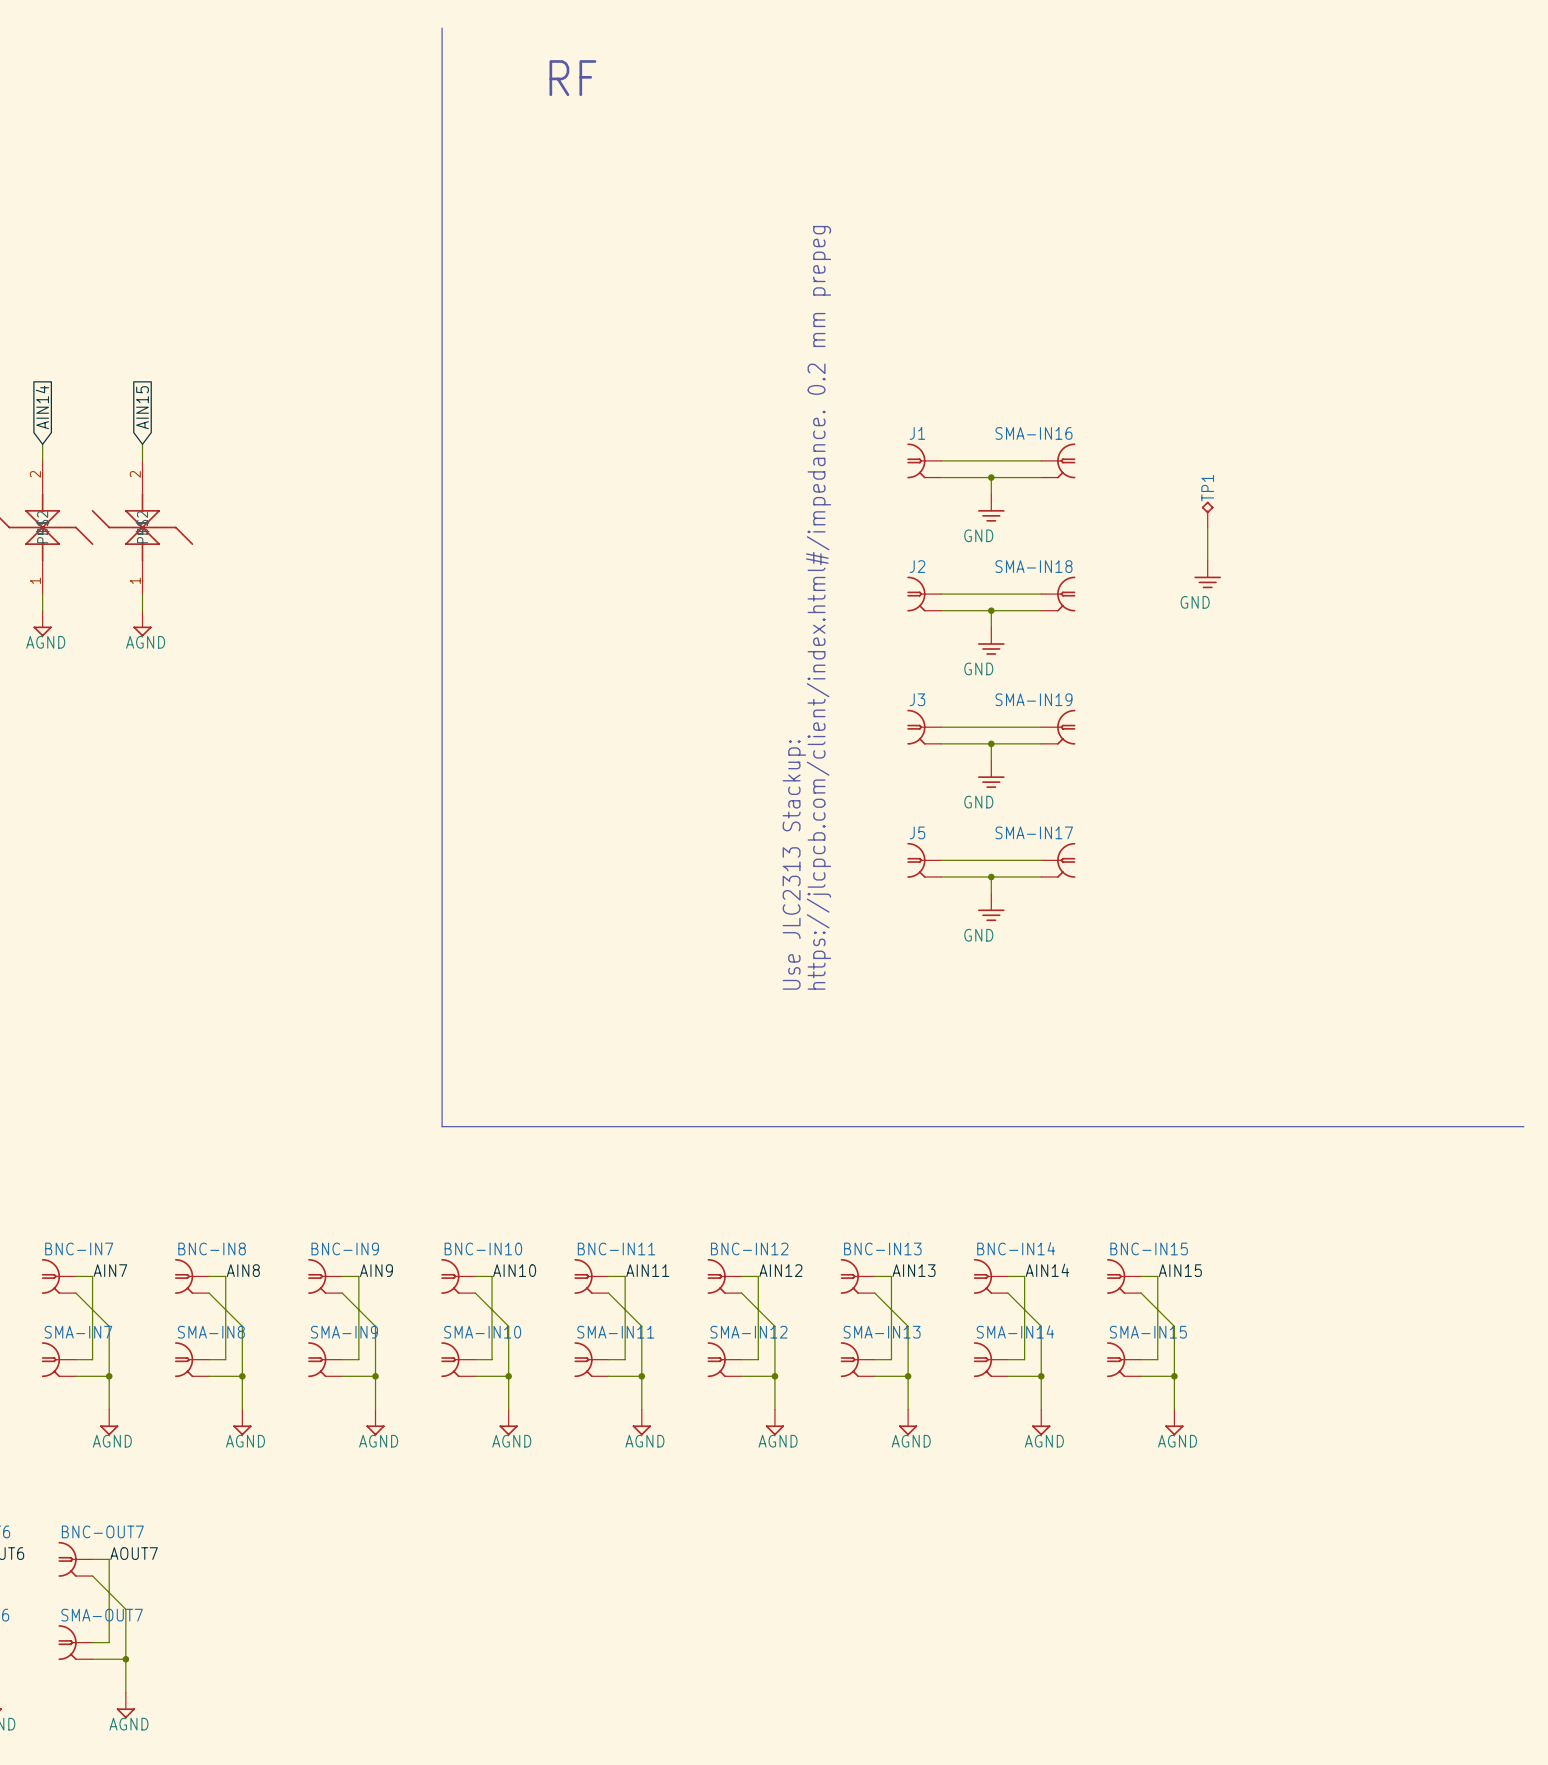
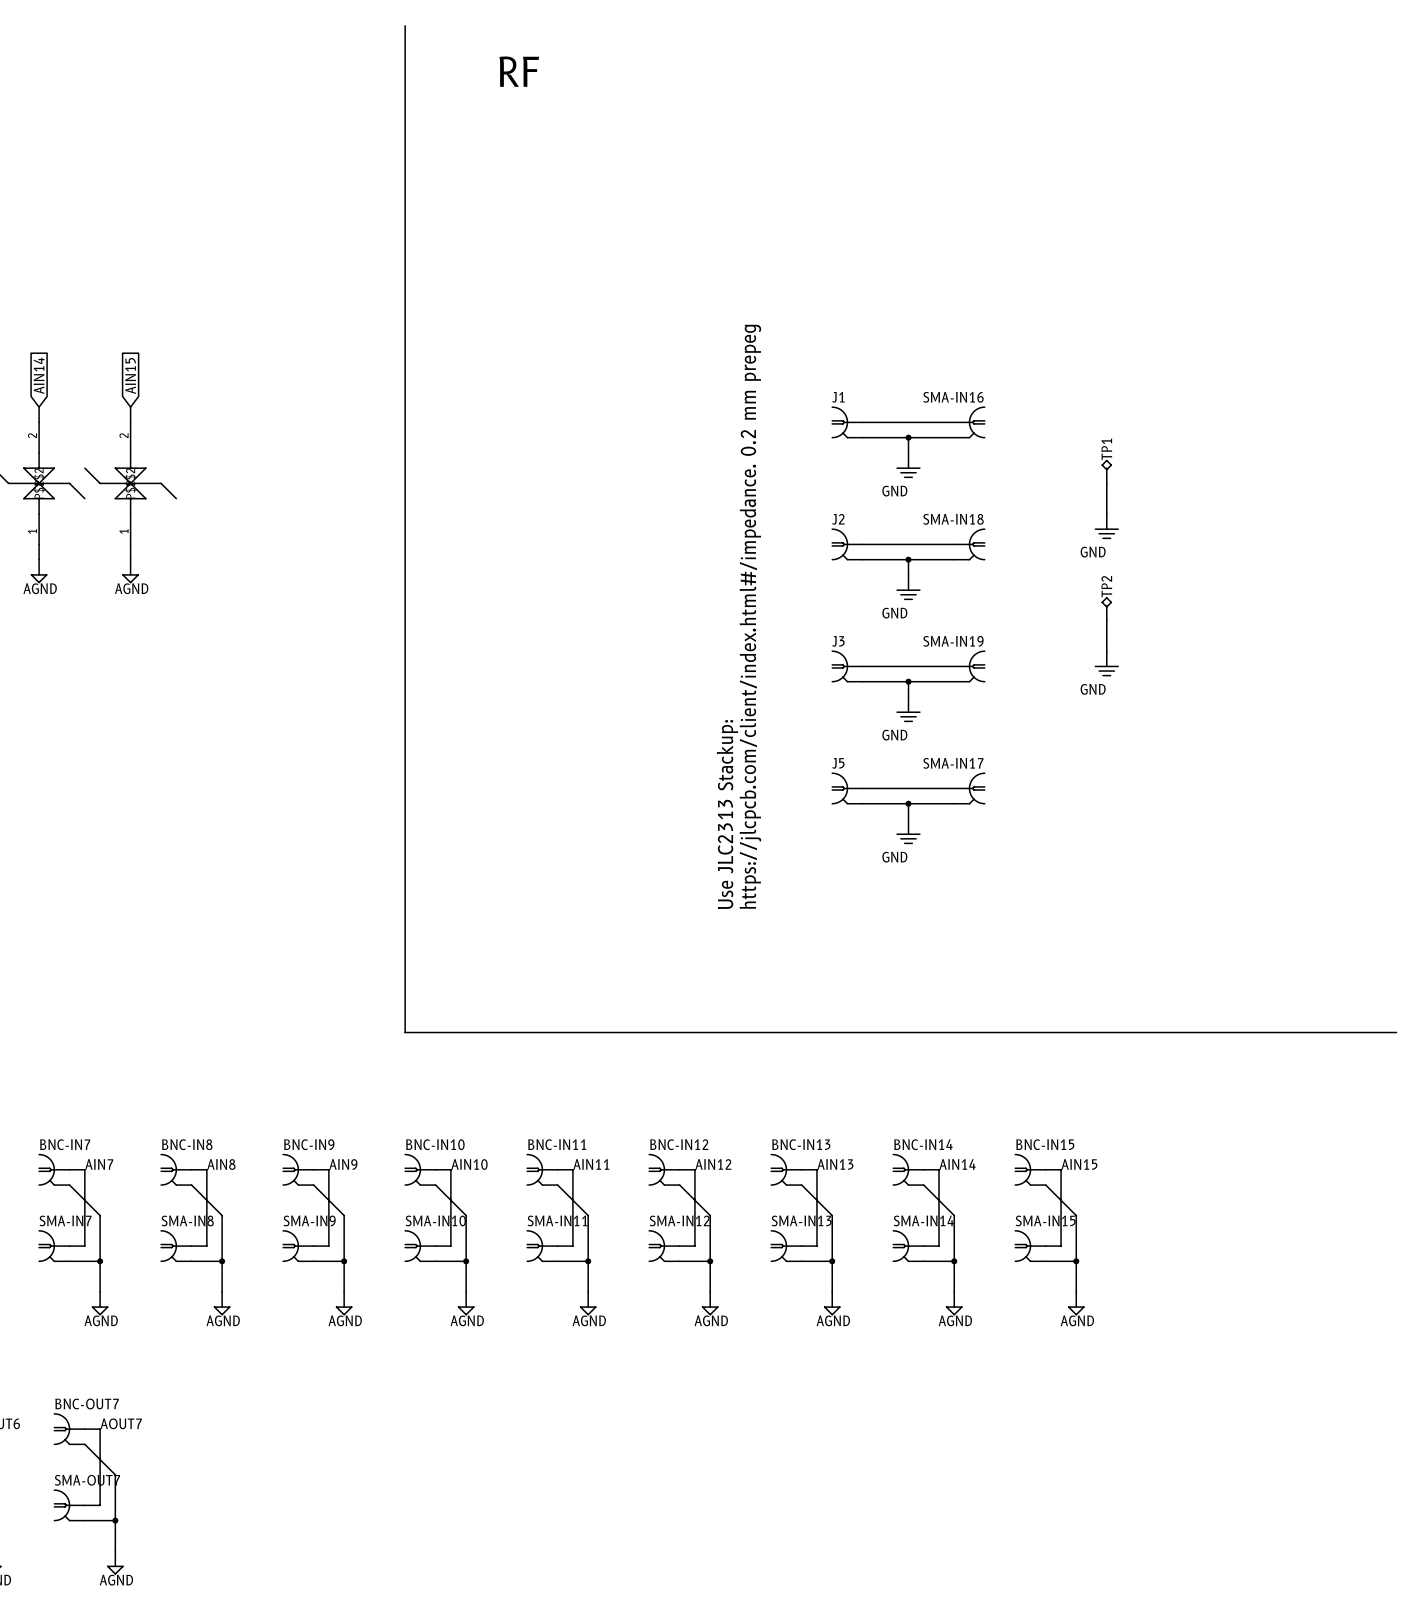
TP2: none -> (1106, 608)
wire: none -> (1106, 620) (1106, 651)
power symbol: none -> GND (1106, 663)

